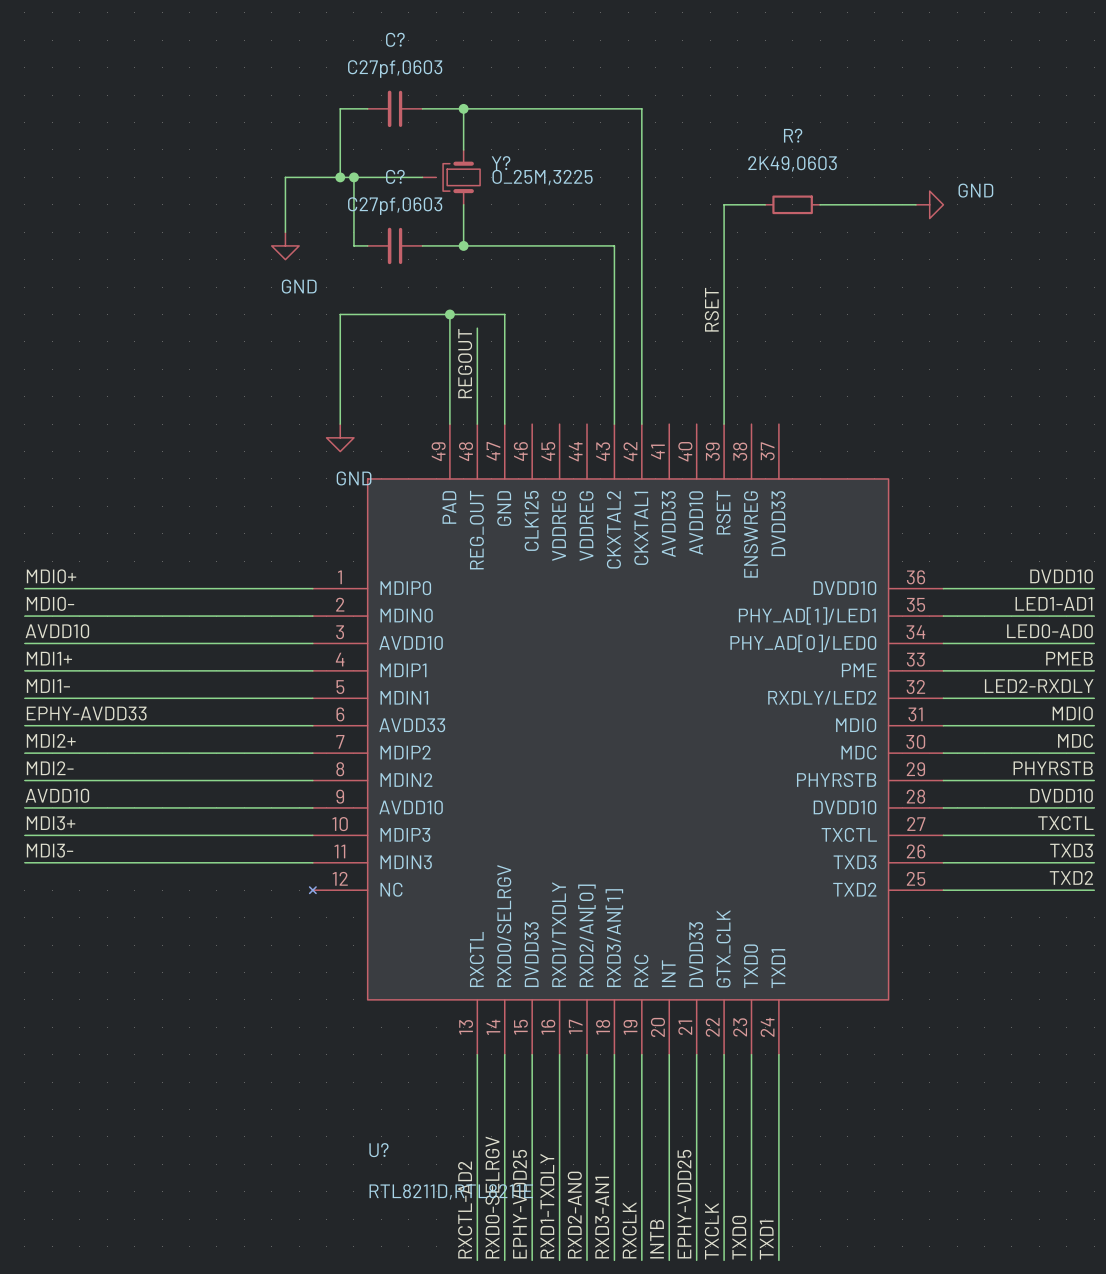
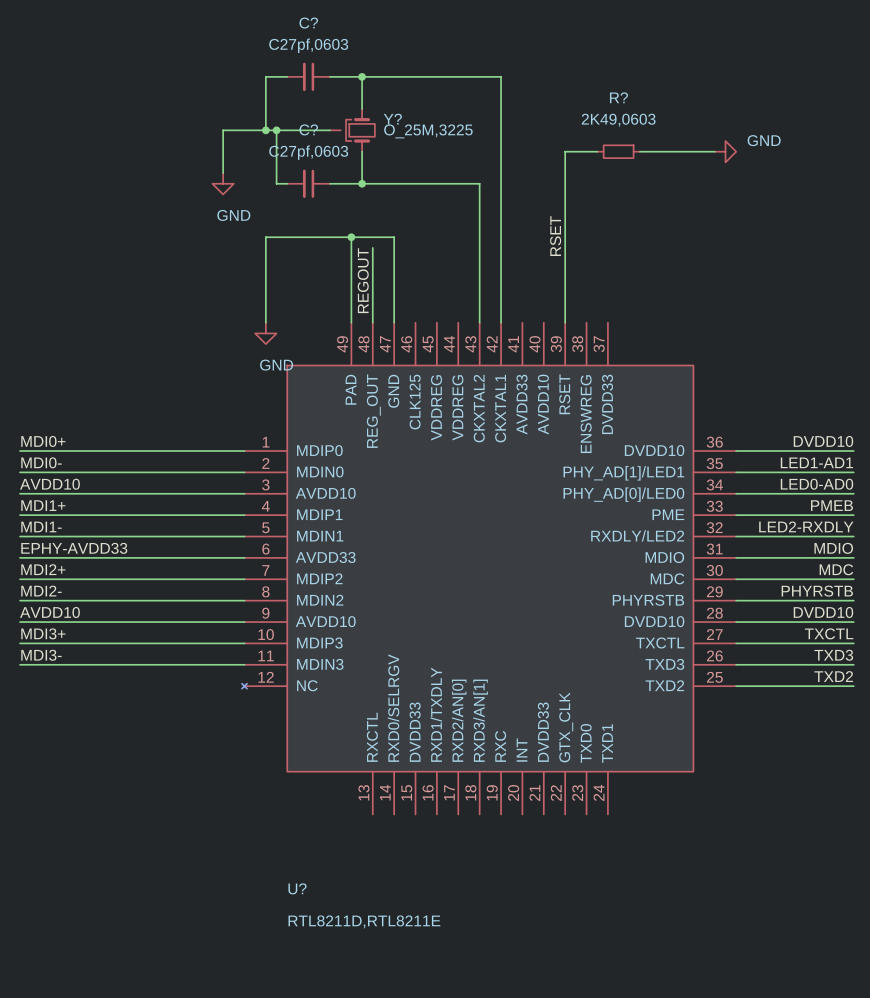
wire: (477, 1054) (477, 1260) -> none
wire: (504, 1054) (504, 1260) -> none
wire: (532, 1054) (532, 1260) -> none
wire: (559, 1054) (559, 1260) -> none
wire: (587, 1054) (587, 1260) -> none
wire: (614, 1054) (614, 1260) -> none
wire: (641, 1054) (641, 1260) -> none
wire: (669, 1054) (669, 1260) -> none
wire: (696, 1054) (696, 1260) -> none
wire: (724, 1054) (724, 1260) -> none
wire: (751, 1054) (751, 1260) -> none
wire: (778, 1054) (778, 1260) -> none
label: RXD0-SELRGV (492, 1197) -> none
label: EPHY-VDD25 (519, 1204) -> none
label: EPHY-VDD25 (684, 1204) -> none
label: RXD1-TXDLY (547, 1206) -> none
label: RXCTL-AD2 (465, 1210) -> none
label: RXD2-AN0 (574, 1215) -> none
label: RXD3-AN1 (602, 1217) -> none
label: RXCLK (629, 1230) -> none
label: TXCLK (711, 1231) -> none
label: TXD0 (739, 1237) -> none
label: INTB (657, 1239) -> none
label: TXD1 (766, 1239) -> none

